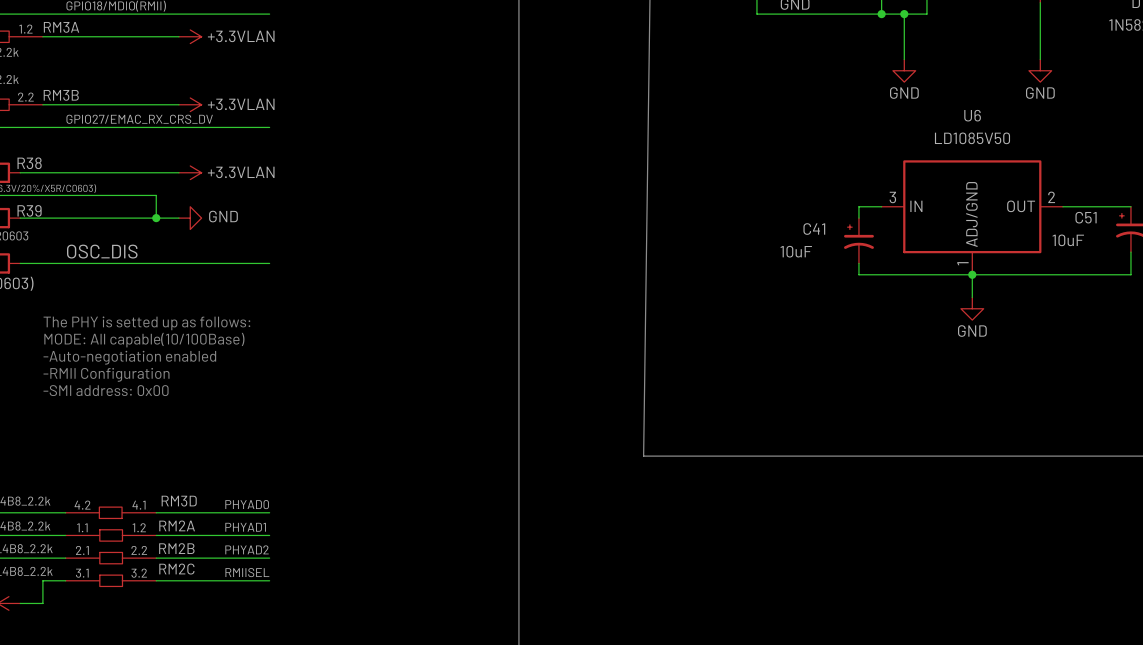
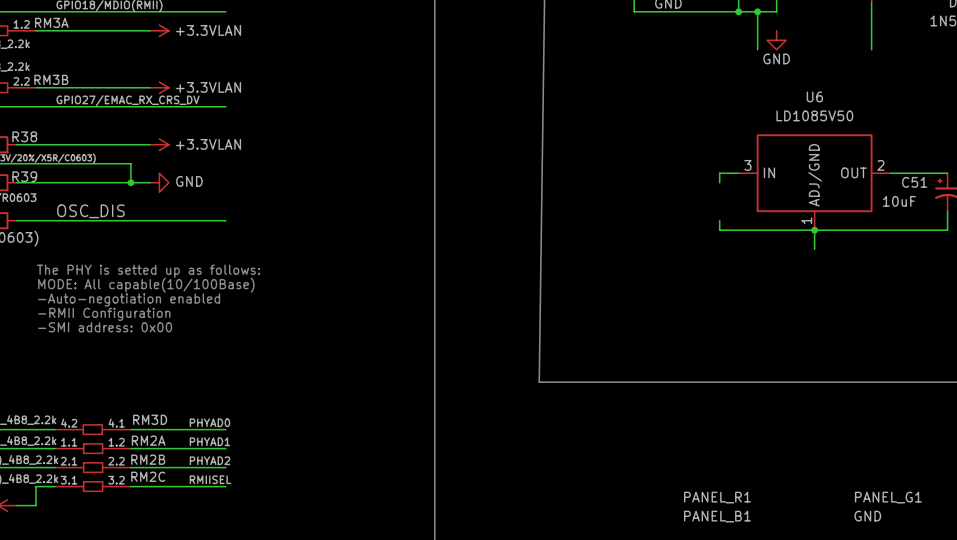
power symbol position: GND (904, 70) -> GND (776, 40)
power symbol: GND (1040, 70) -> none
C41: 10uF (858, 240) -> none
power symbol: GND (972, 308) -> none
label: none -> PANEL_R1 (717, 497)
label: none -> PANEL_G1 (888, 497)
label: none -> PANEL_B1 (717, 516)
label: none -> GND (867, 516)

